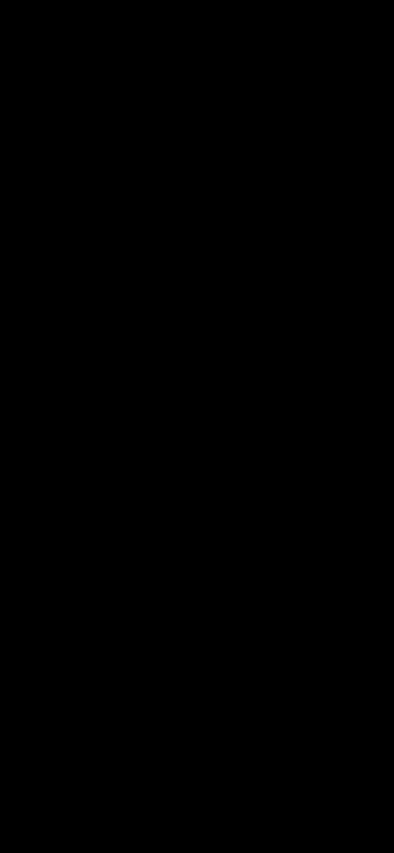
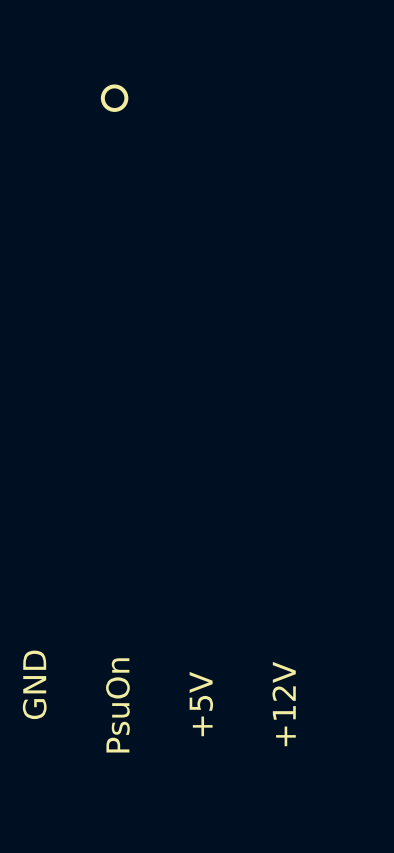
drawing: none -> [100, 84, 129, 112]
text: none -> GND (34, 684)
text: none -> +5V (201, 704)
text: none -> +12V (284, 704)
text: none -> PsuOn (117, 705)

